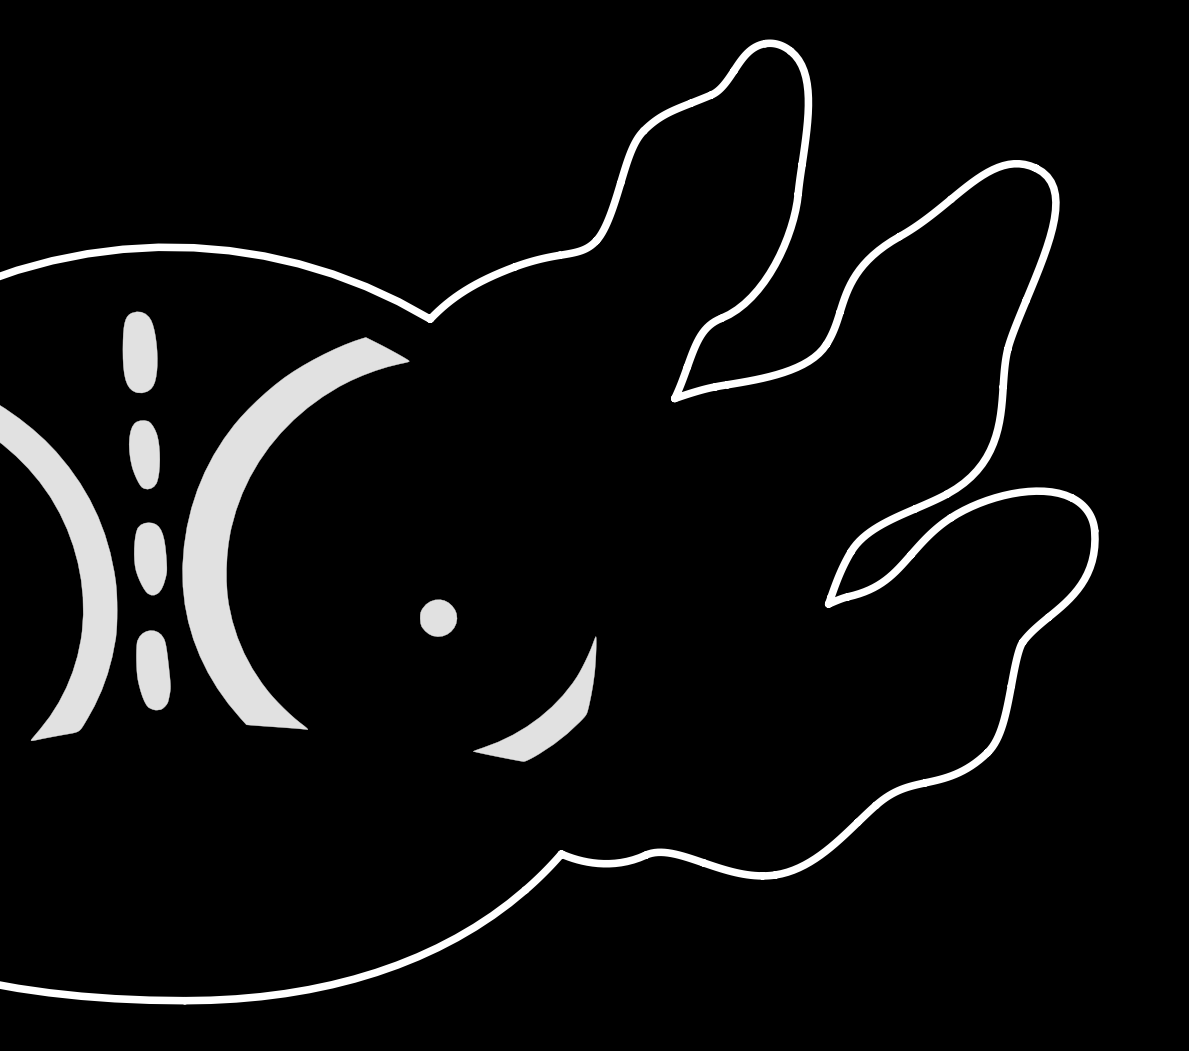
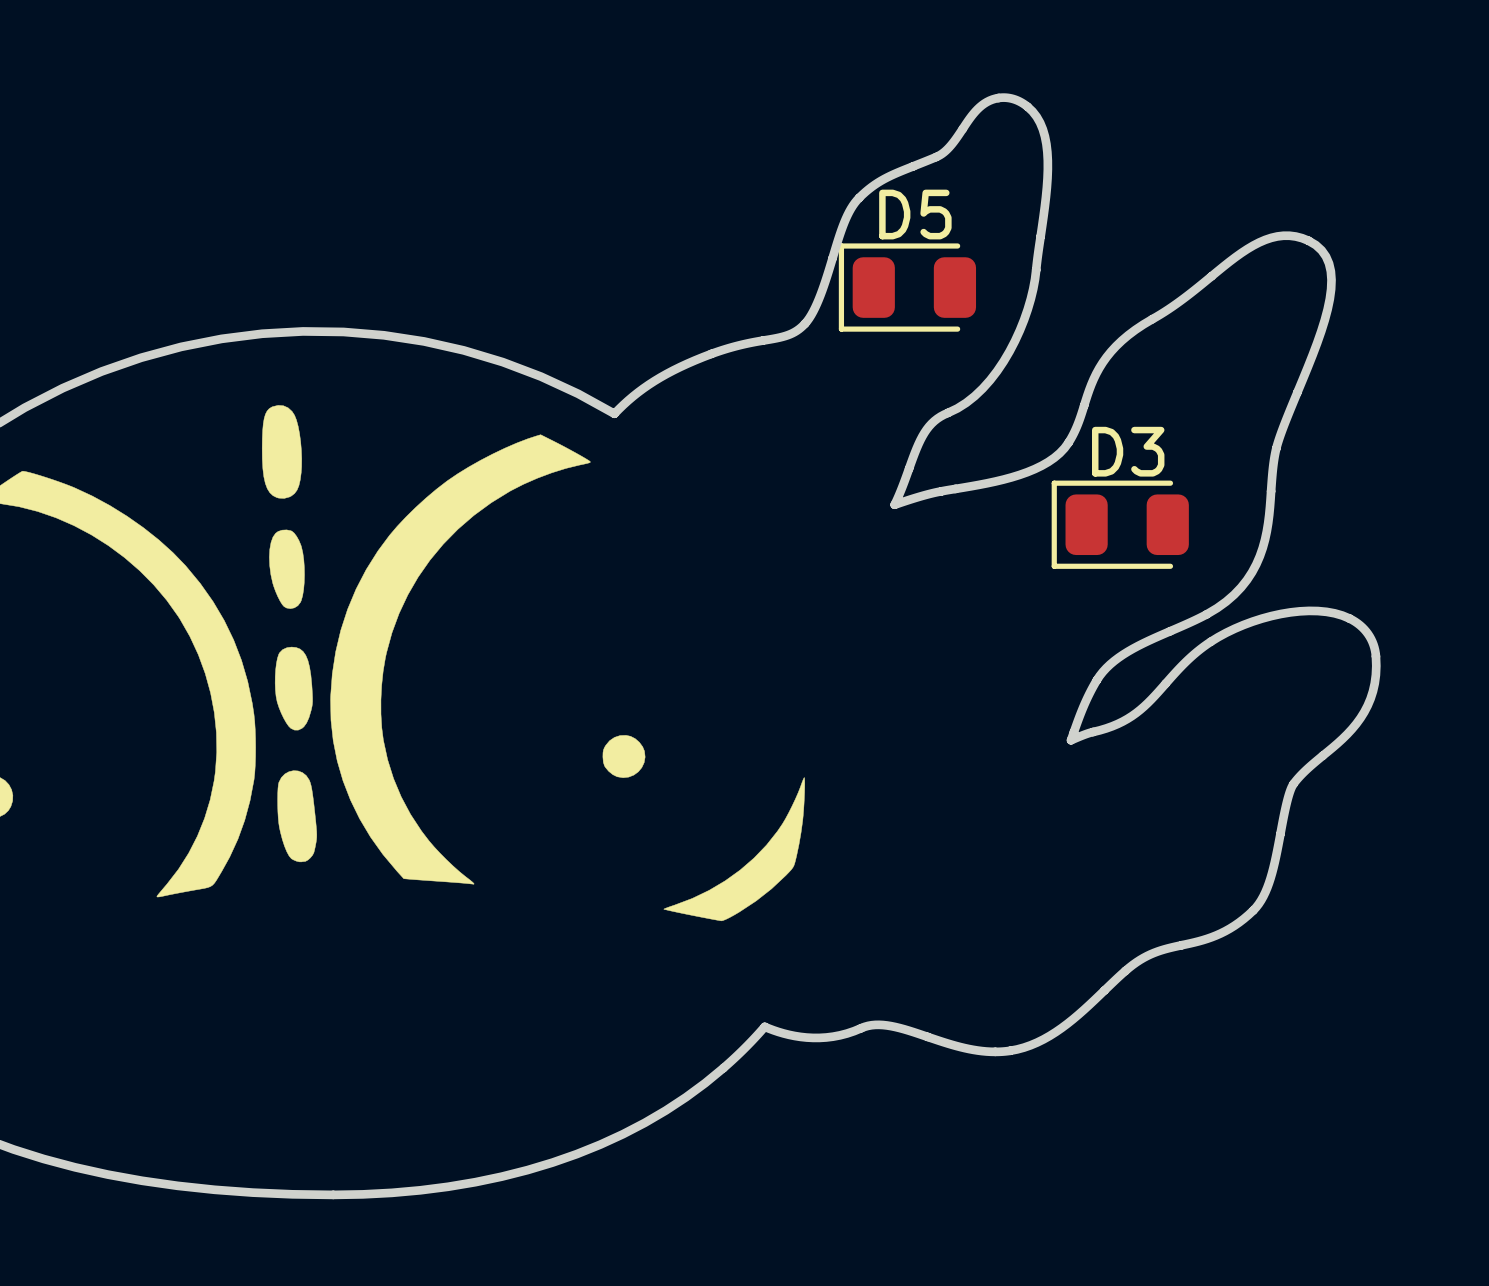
D5: none -> (907, 287)
D3: none -> (1120, 524)

